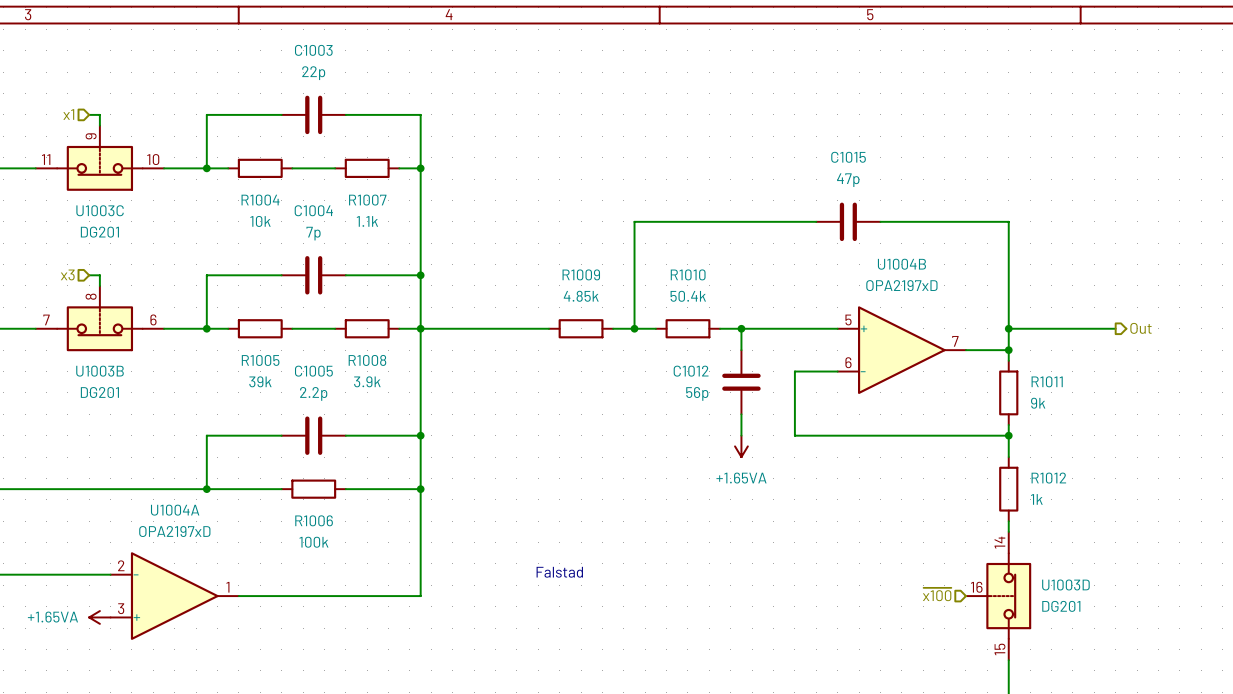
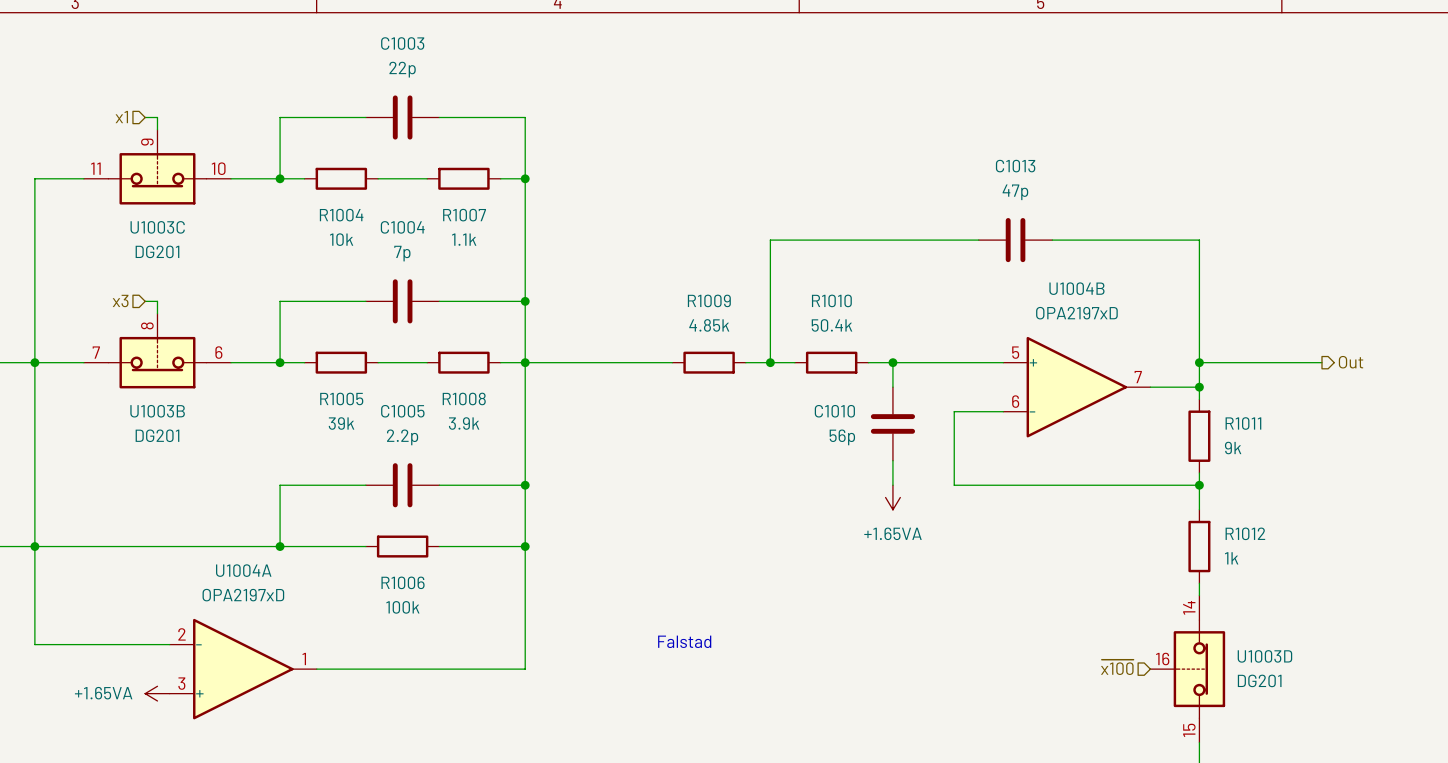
C1015 name: C1015 (848, 157) -> C1013 (1015, 166)
C1012 name: C1012 (691, 371) -> C1010 (834, 411)

